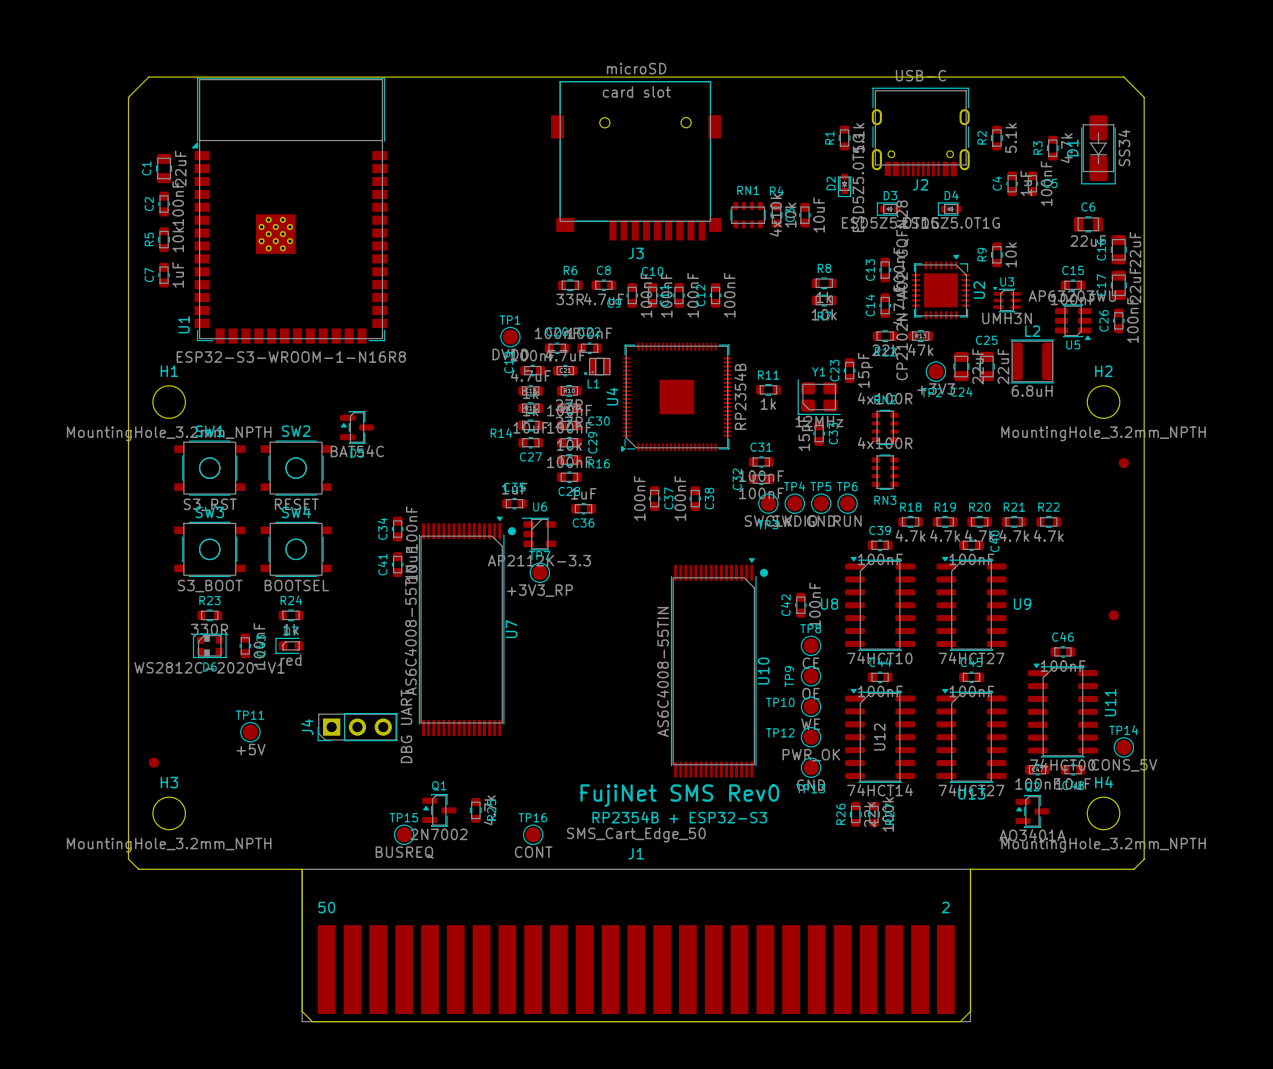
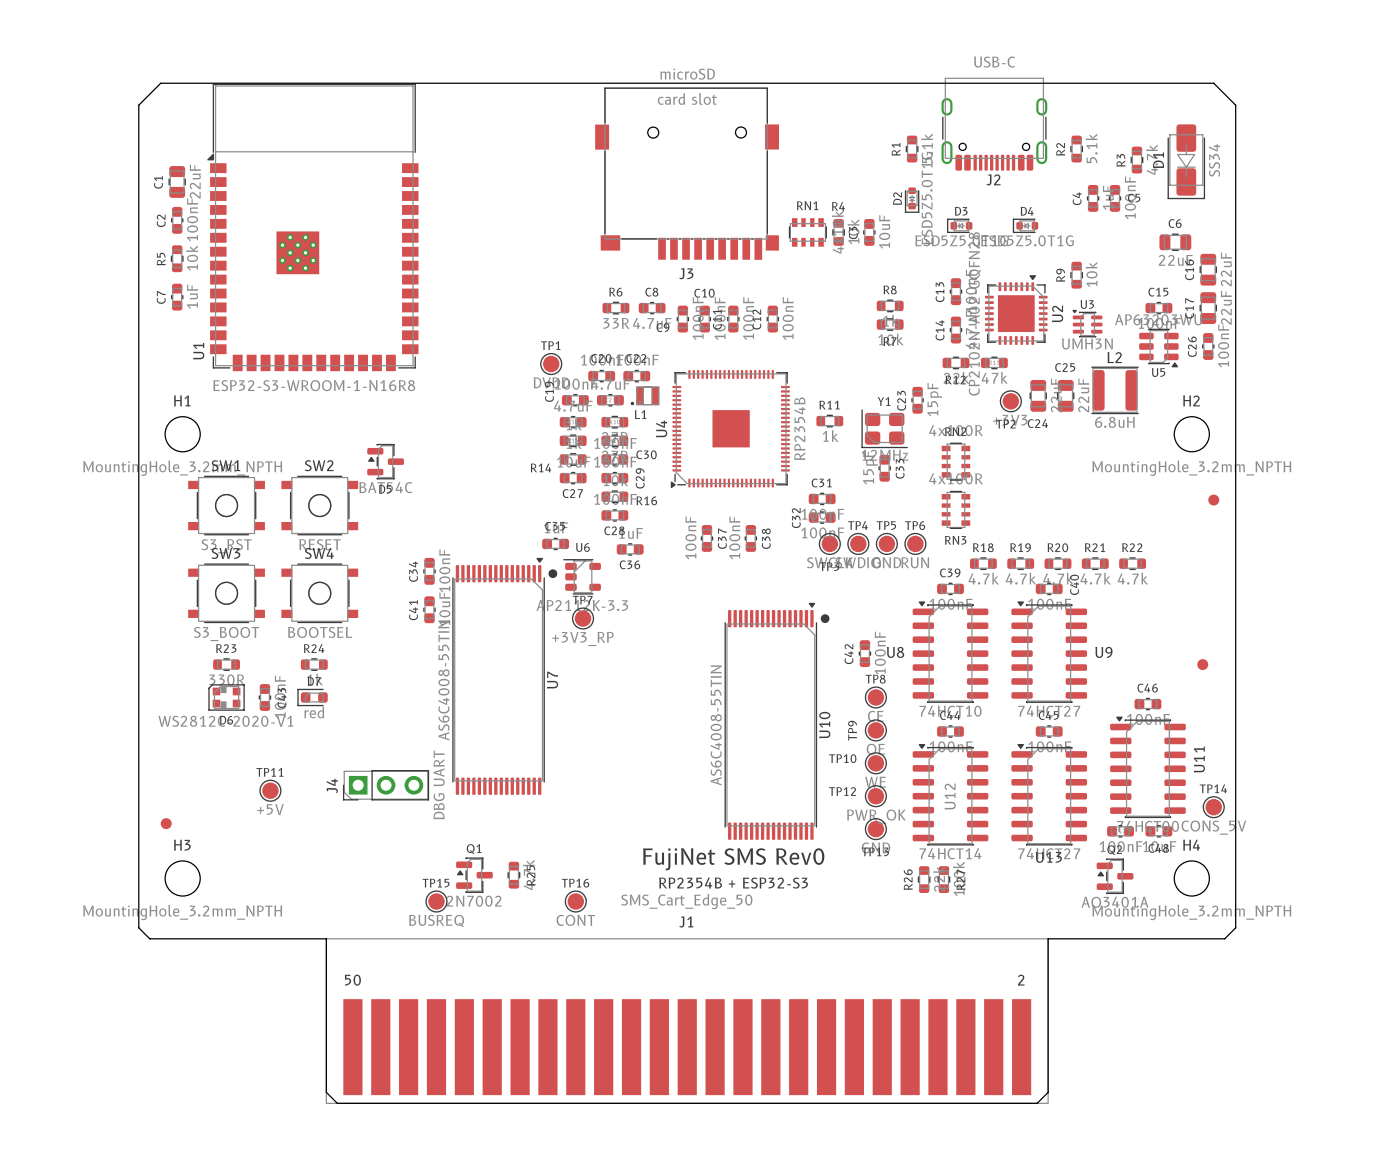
J2 footprint: [871, 87, 970, 177] -> [941, 77, 1048, 171]

